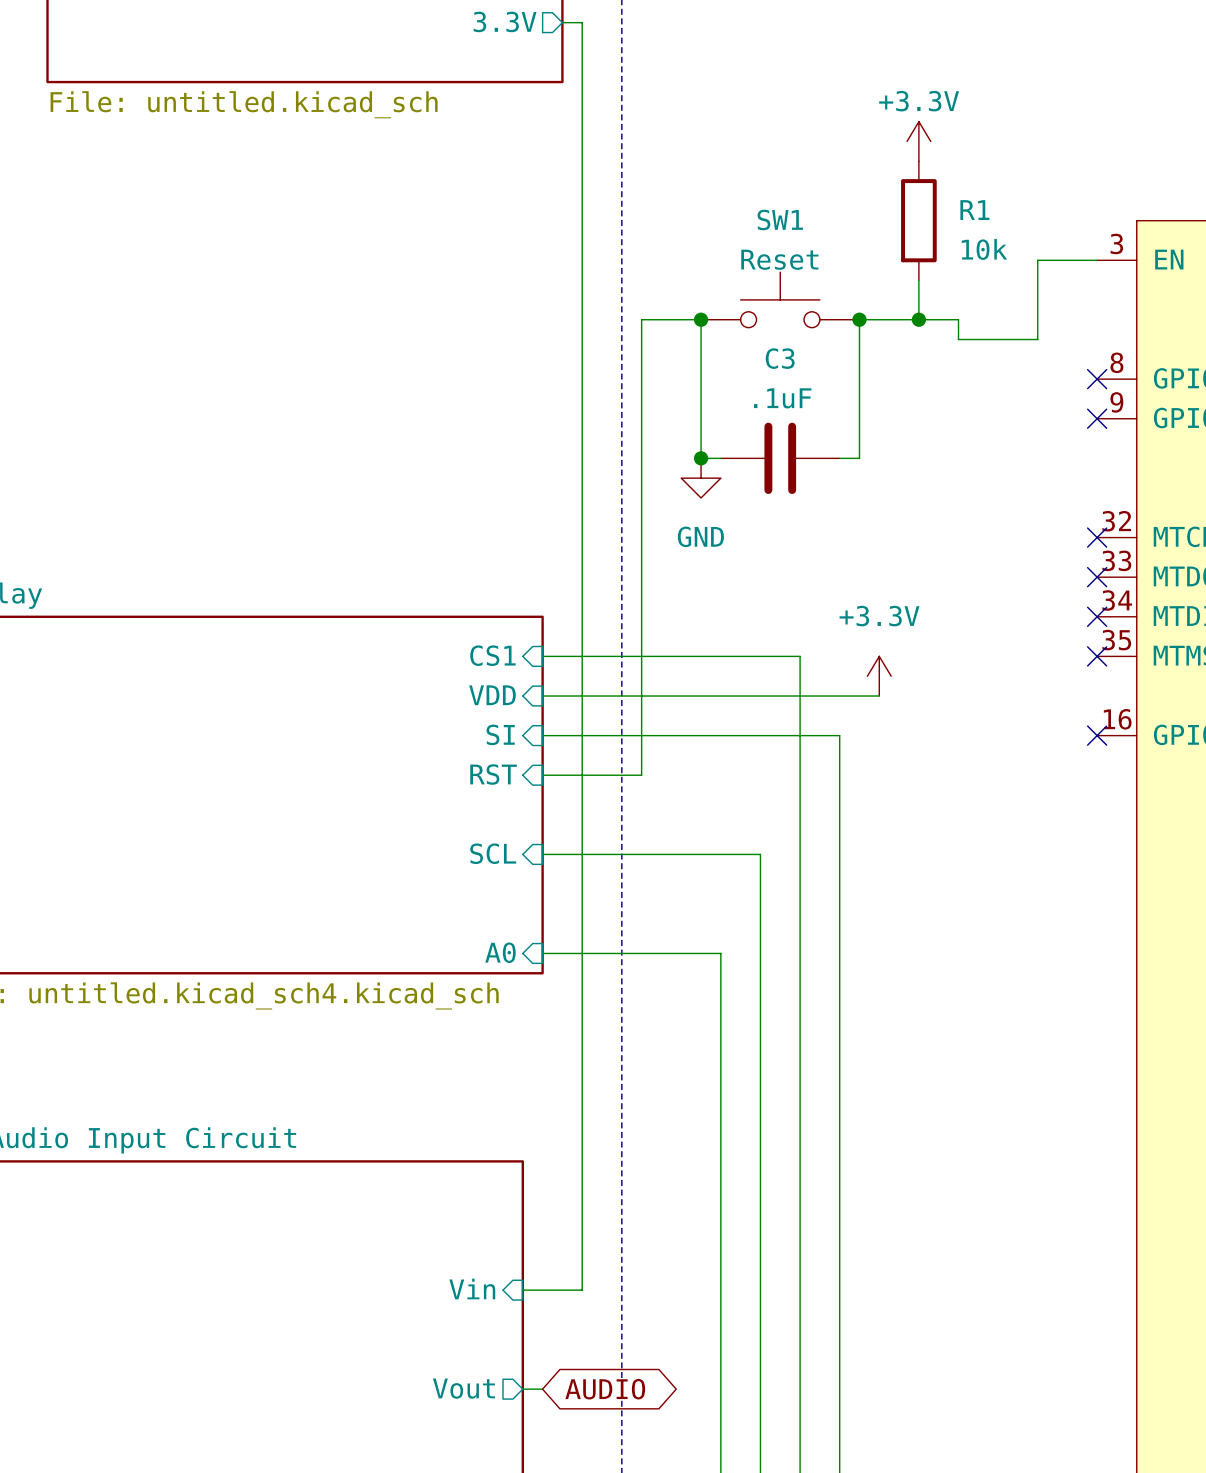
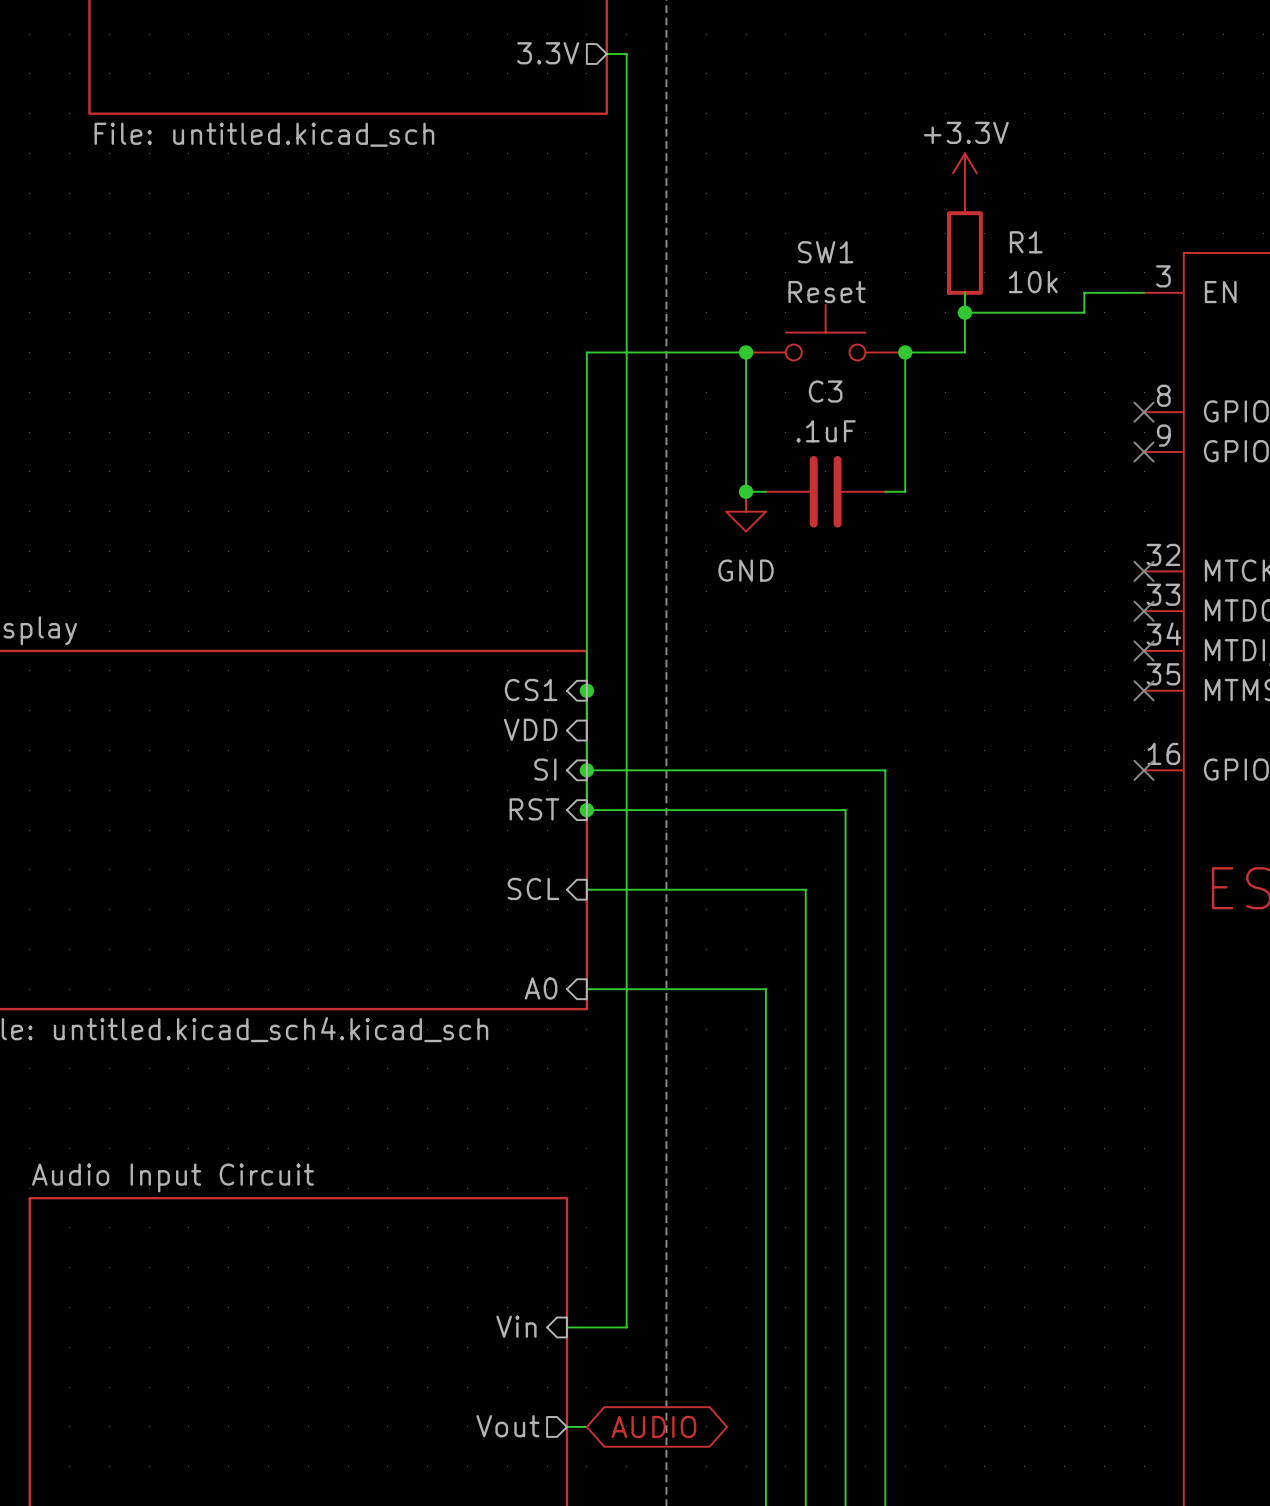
wire: (1037, 280) (1037, 339) (958, 339) (958, 319) (918, 319) -> (1084, 312) (964, 312) (964, 292)
wire: (641, 319) (641, 775) -> (686, 352) (586, 352) (586, 810)
junction position: (918, 319) -> (964, 312)
wire: (542, 656) (800, 656) (800, 775) -> (686, 810) (845, 810)
junction: none -> (586, 690)
power symbol: +3.3V (879, 676) -> none
wire: (542, 696) (879, 696) -> none
junction: none -> (586, 770)
junction: none -> (586, 810)

